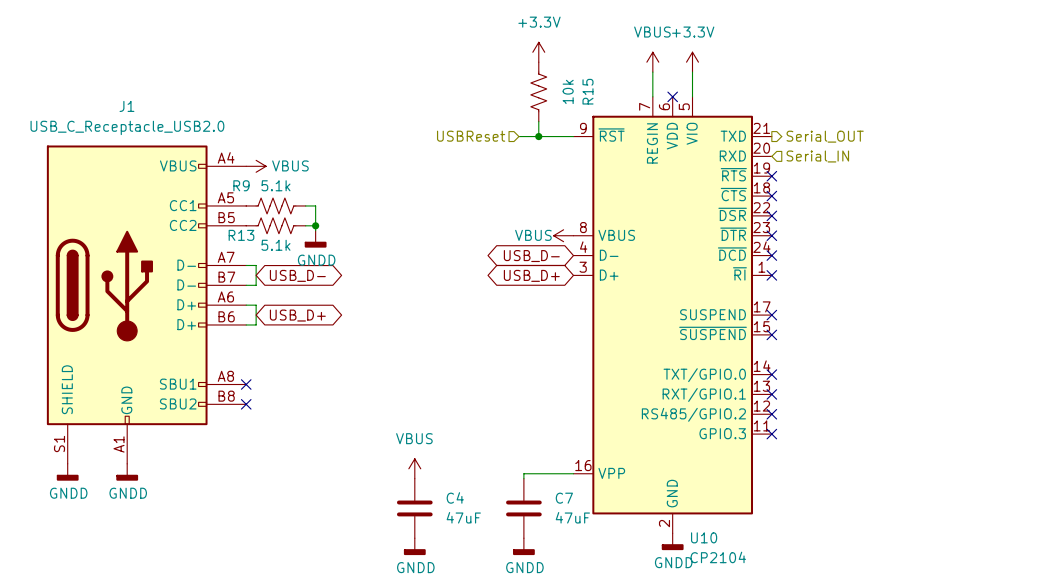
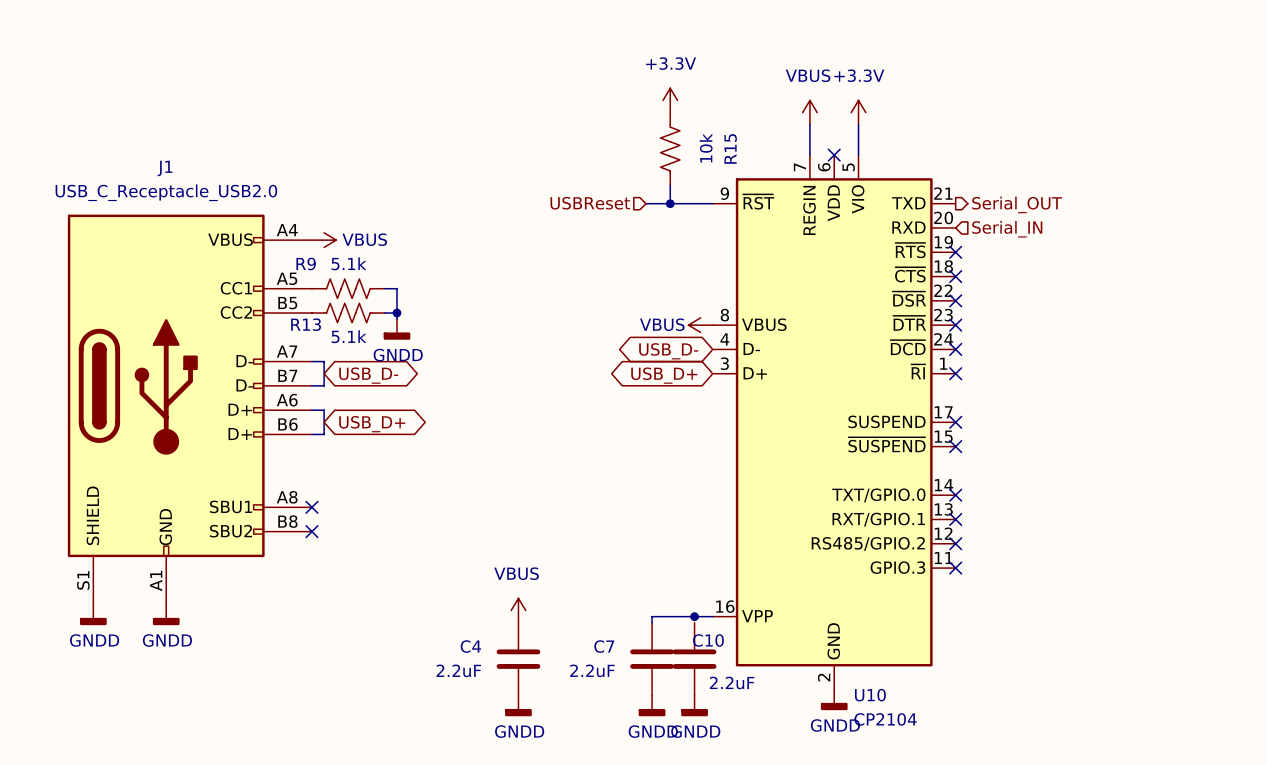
junction: none -> (694, 616)
C4 name position: C4 (455, 497) -> C4 (470, 646)
C7 name position: C7 (564, 498) -> C7 (604, 646)
C10: none -> 2.2uF (694, 659)
C4 value: 47uF (463, 517) -> 2.2uF (458, 670)
C7 value: 47uF (572, 517) -> 2.2uF (592, 670)
power symbol: none -> GNDD (694, 705)

